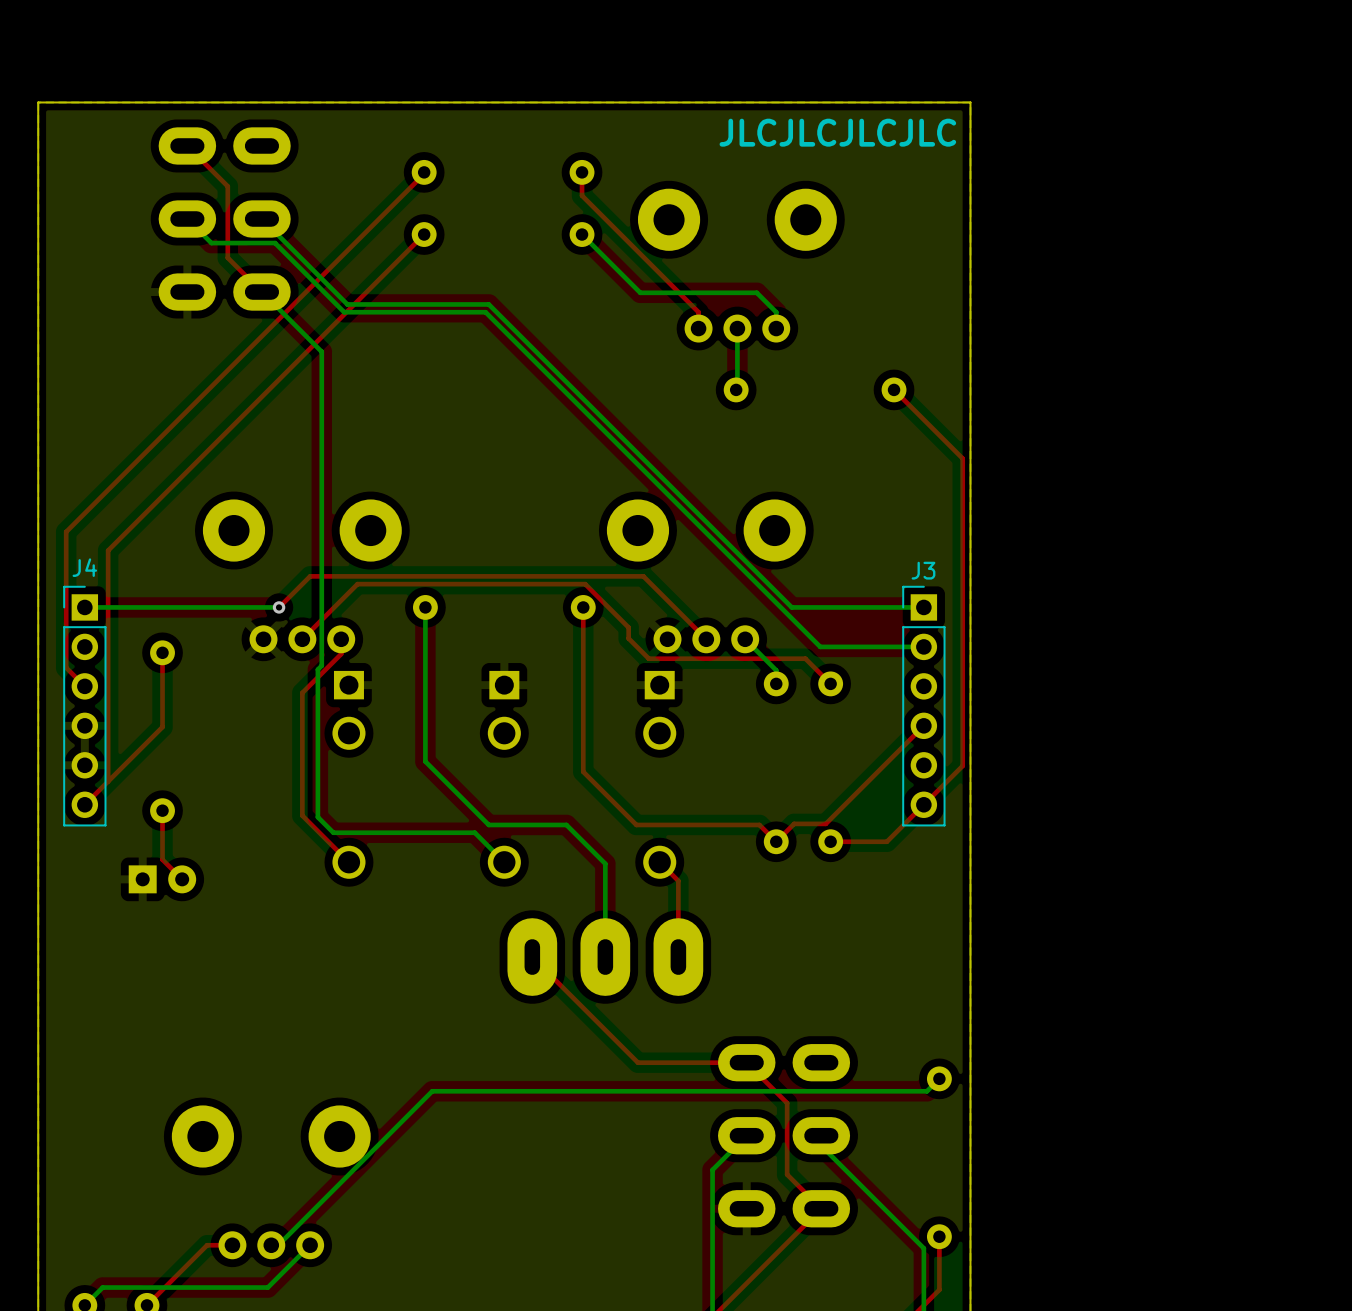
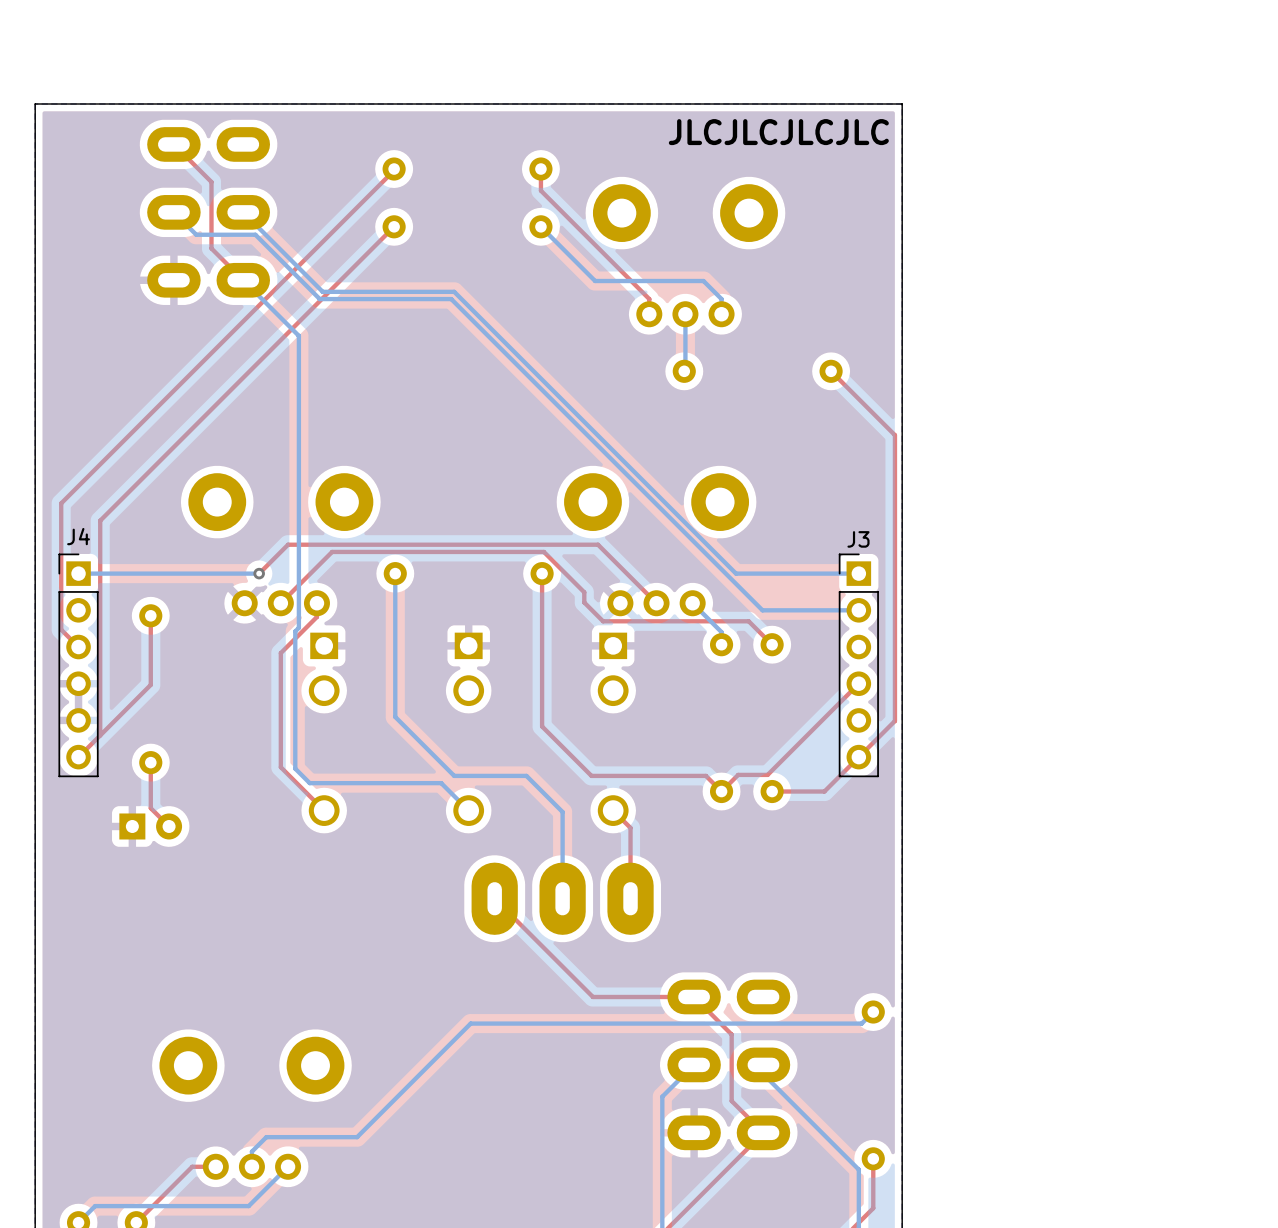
bottom track: (506, 1091) (432, 1091) (278, 1245) (271, 1245) -> (470, 1023) (357, 1137) (266, 1137) (251, 1151) (251, 1166)

